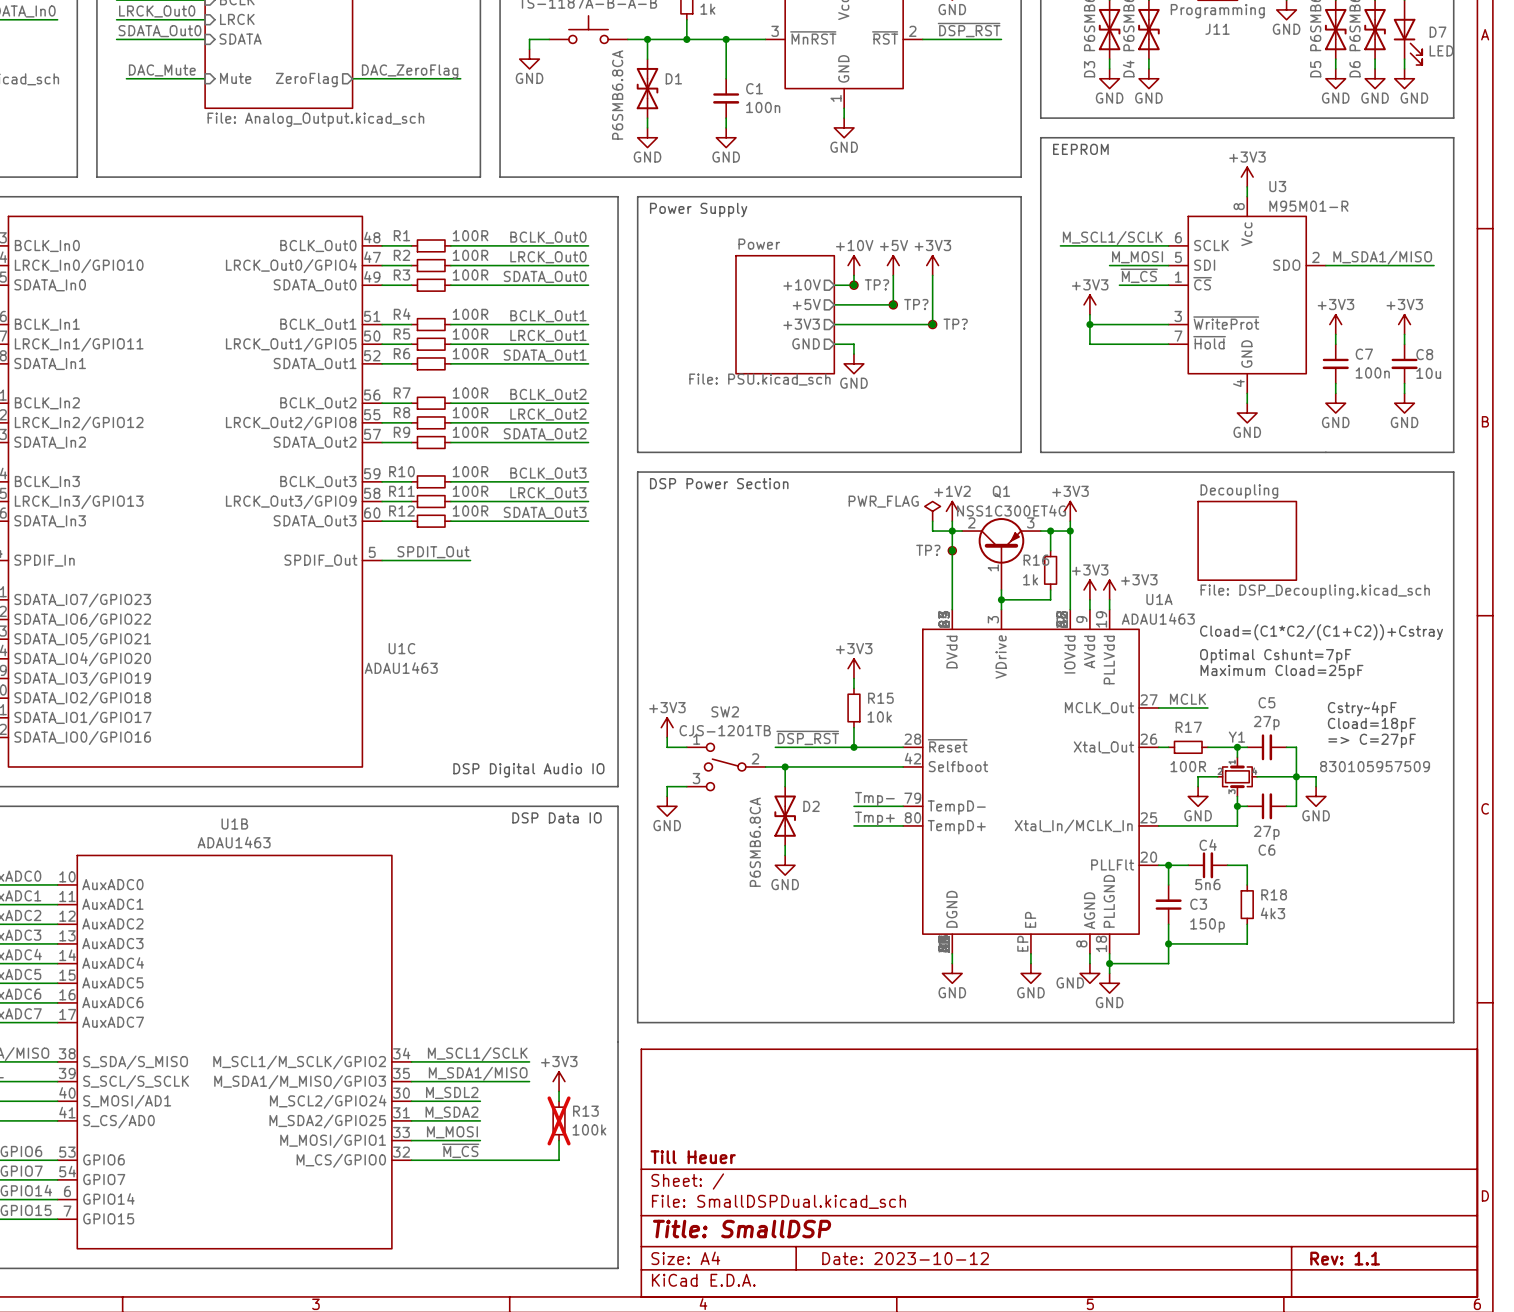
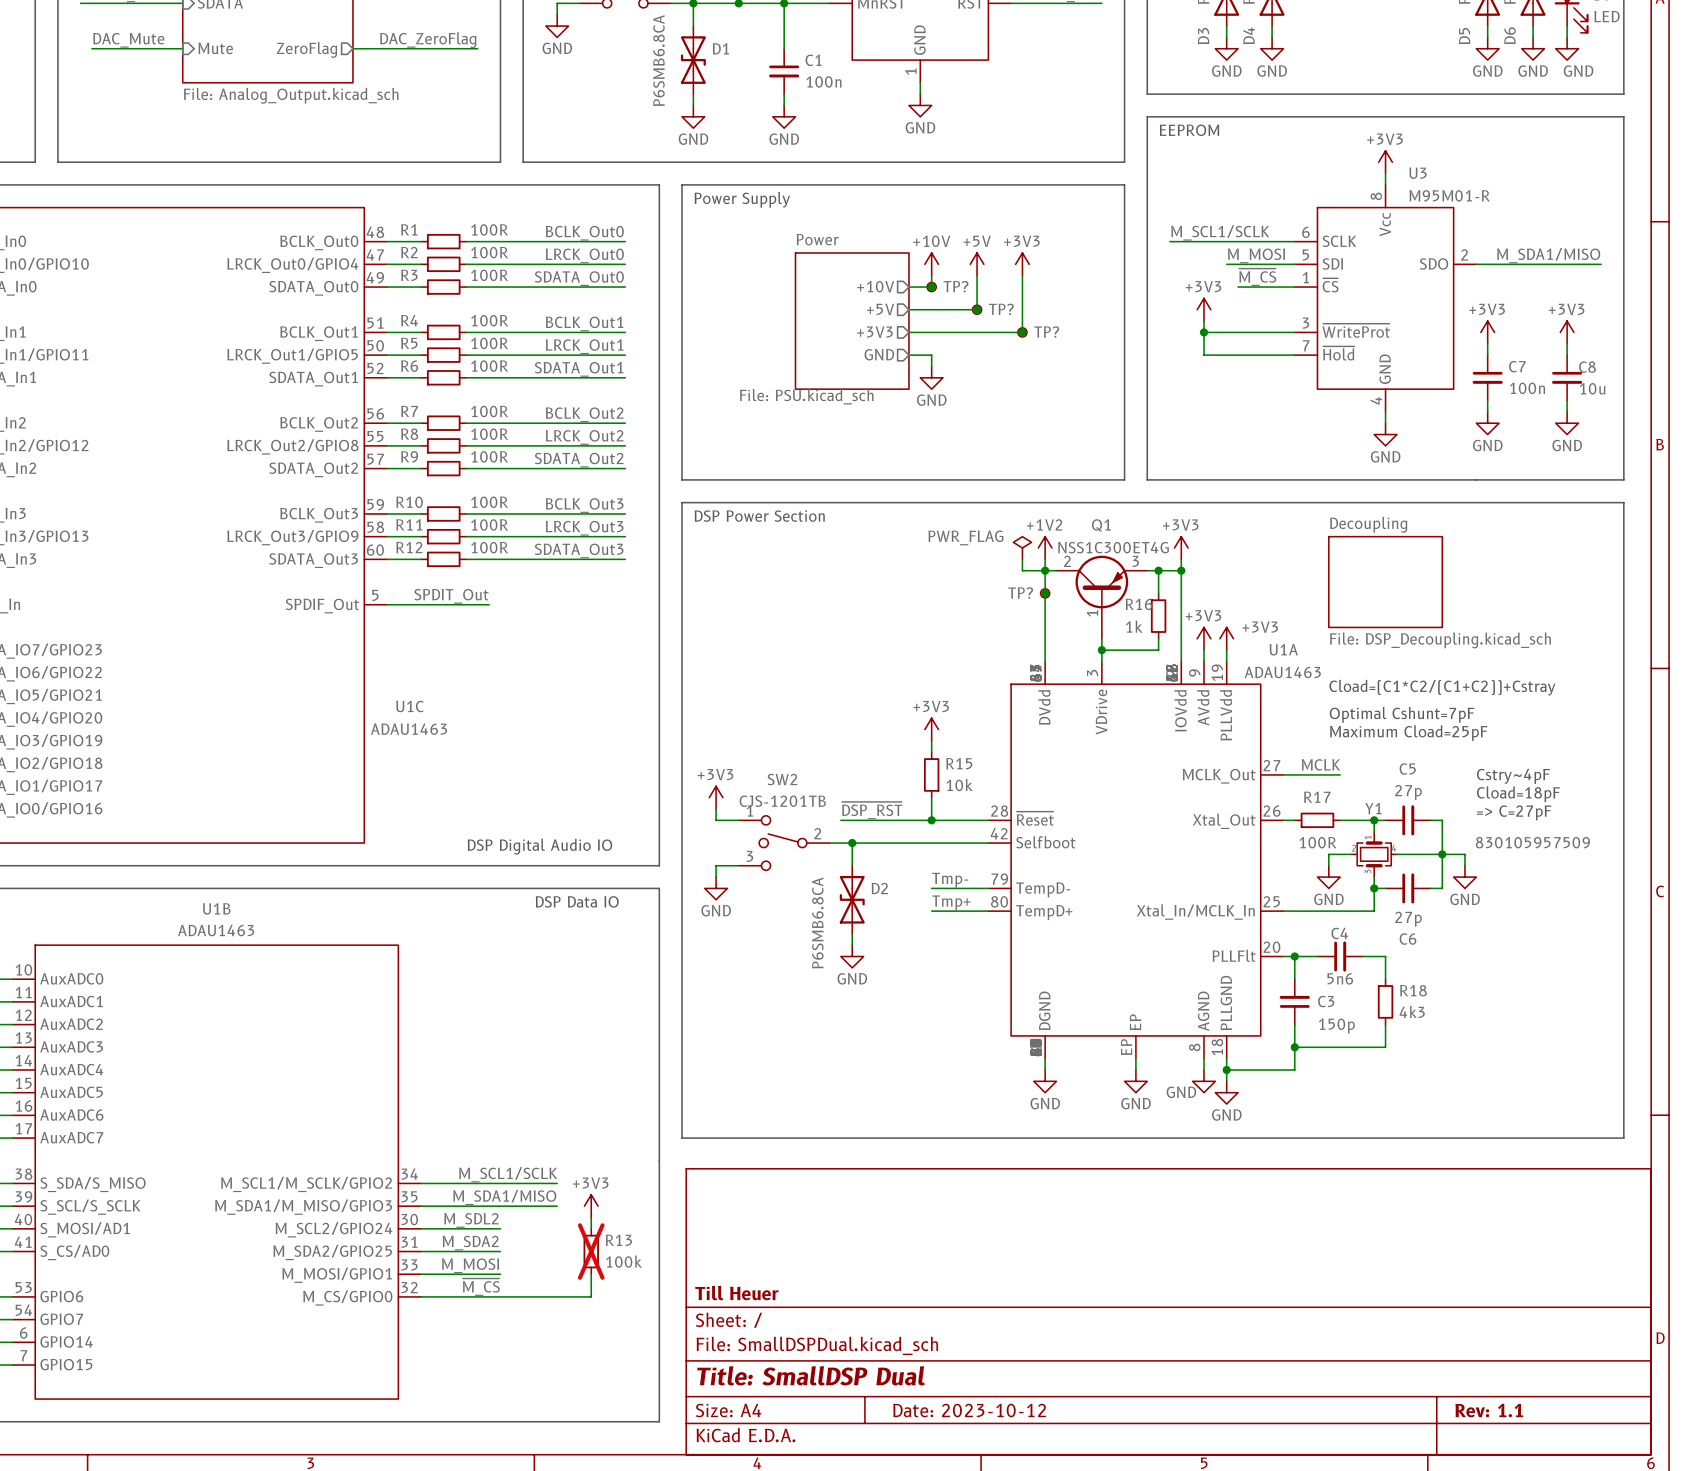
title block: Title: SmallDSP (742, 1229) -> Title: SmallDSP Dual (810, 1375)

